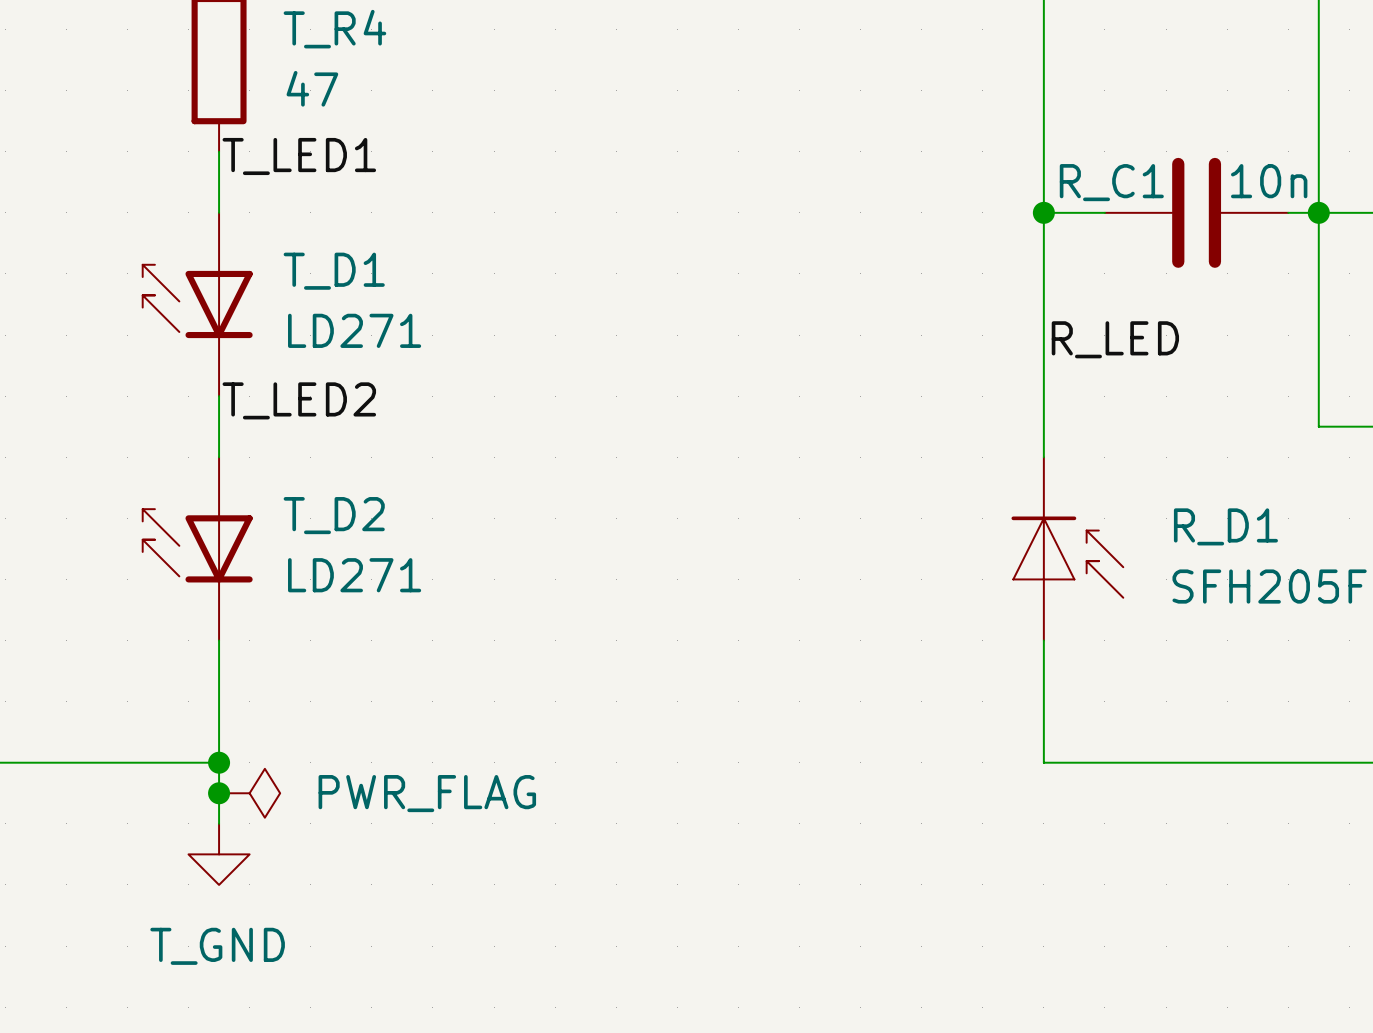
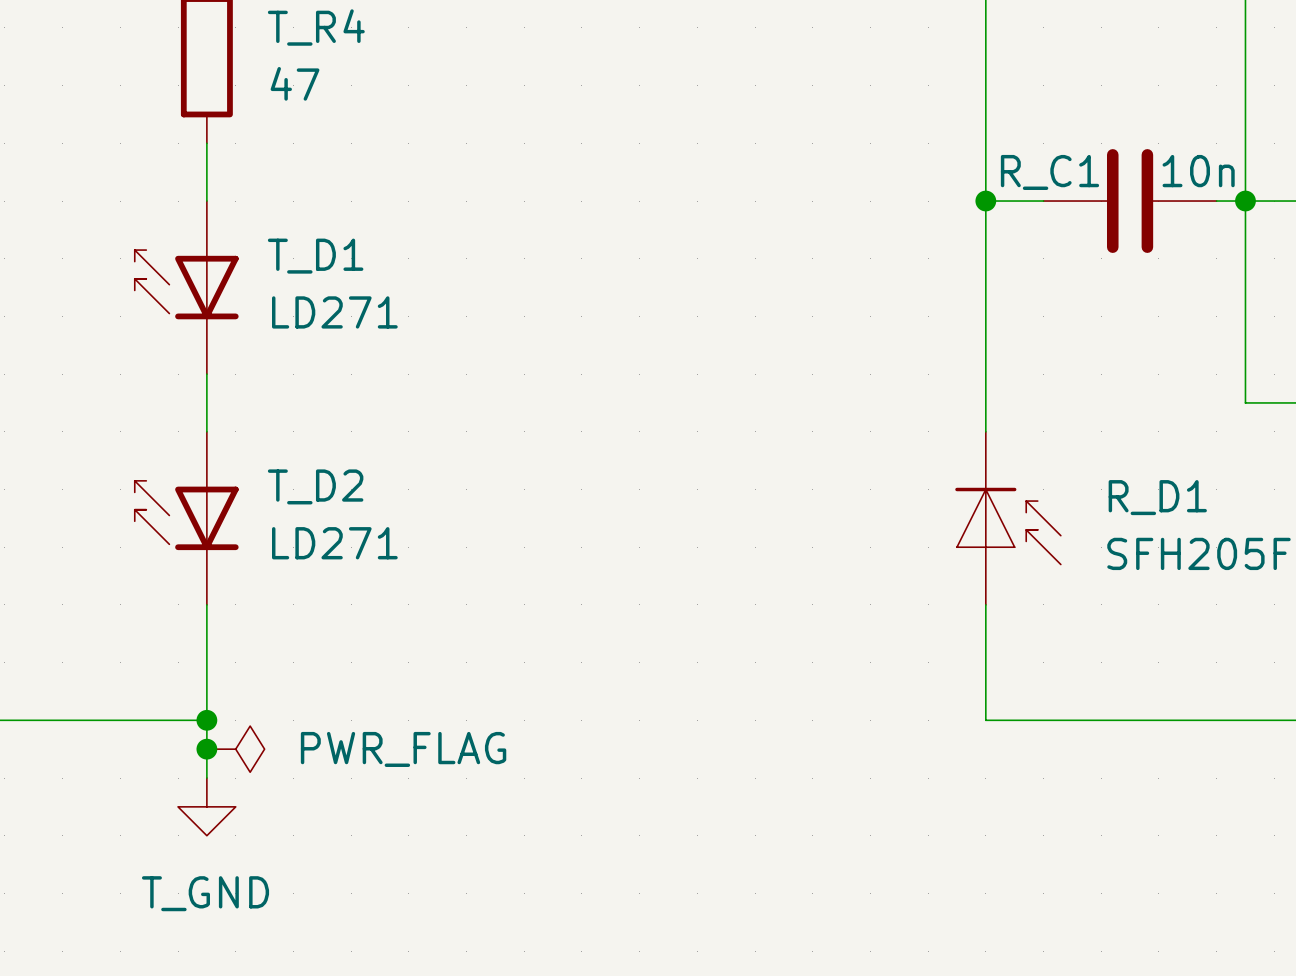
label: T_LED1 (299, 156) -> none
label: R_LED (1115, 339) -> none
label: T_LED2 (299, 400) -> none

